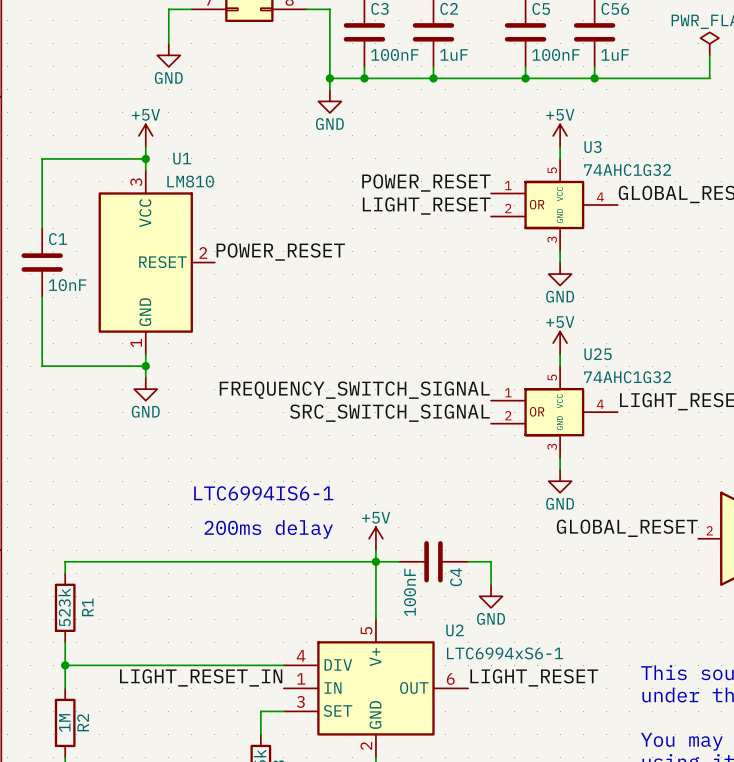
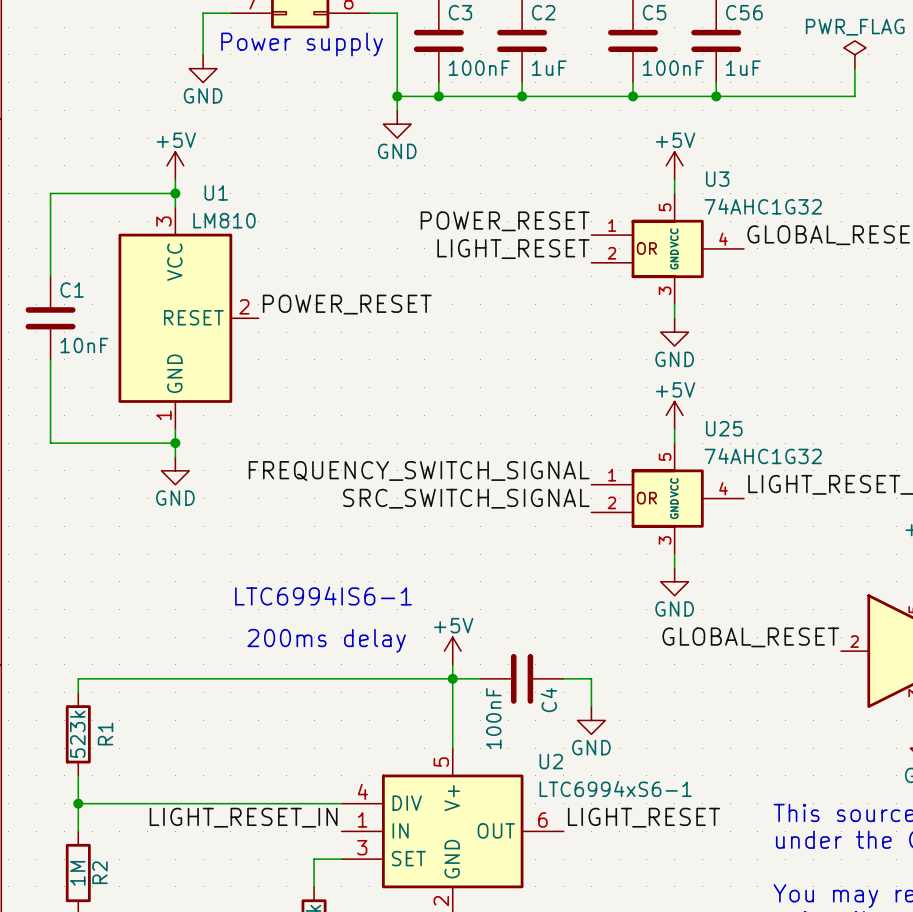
text: none -> Power supply (302, 44)

